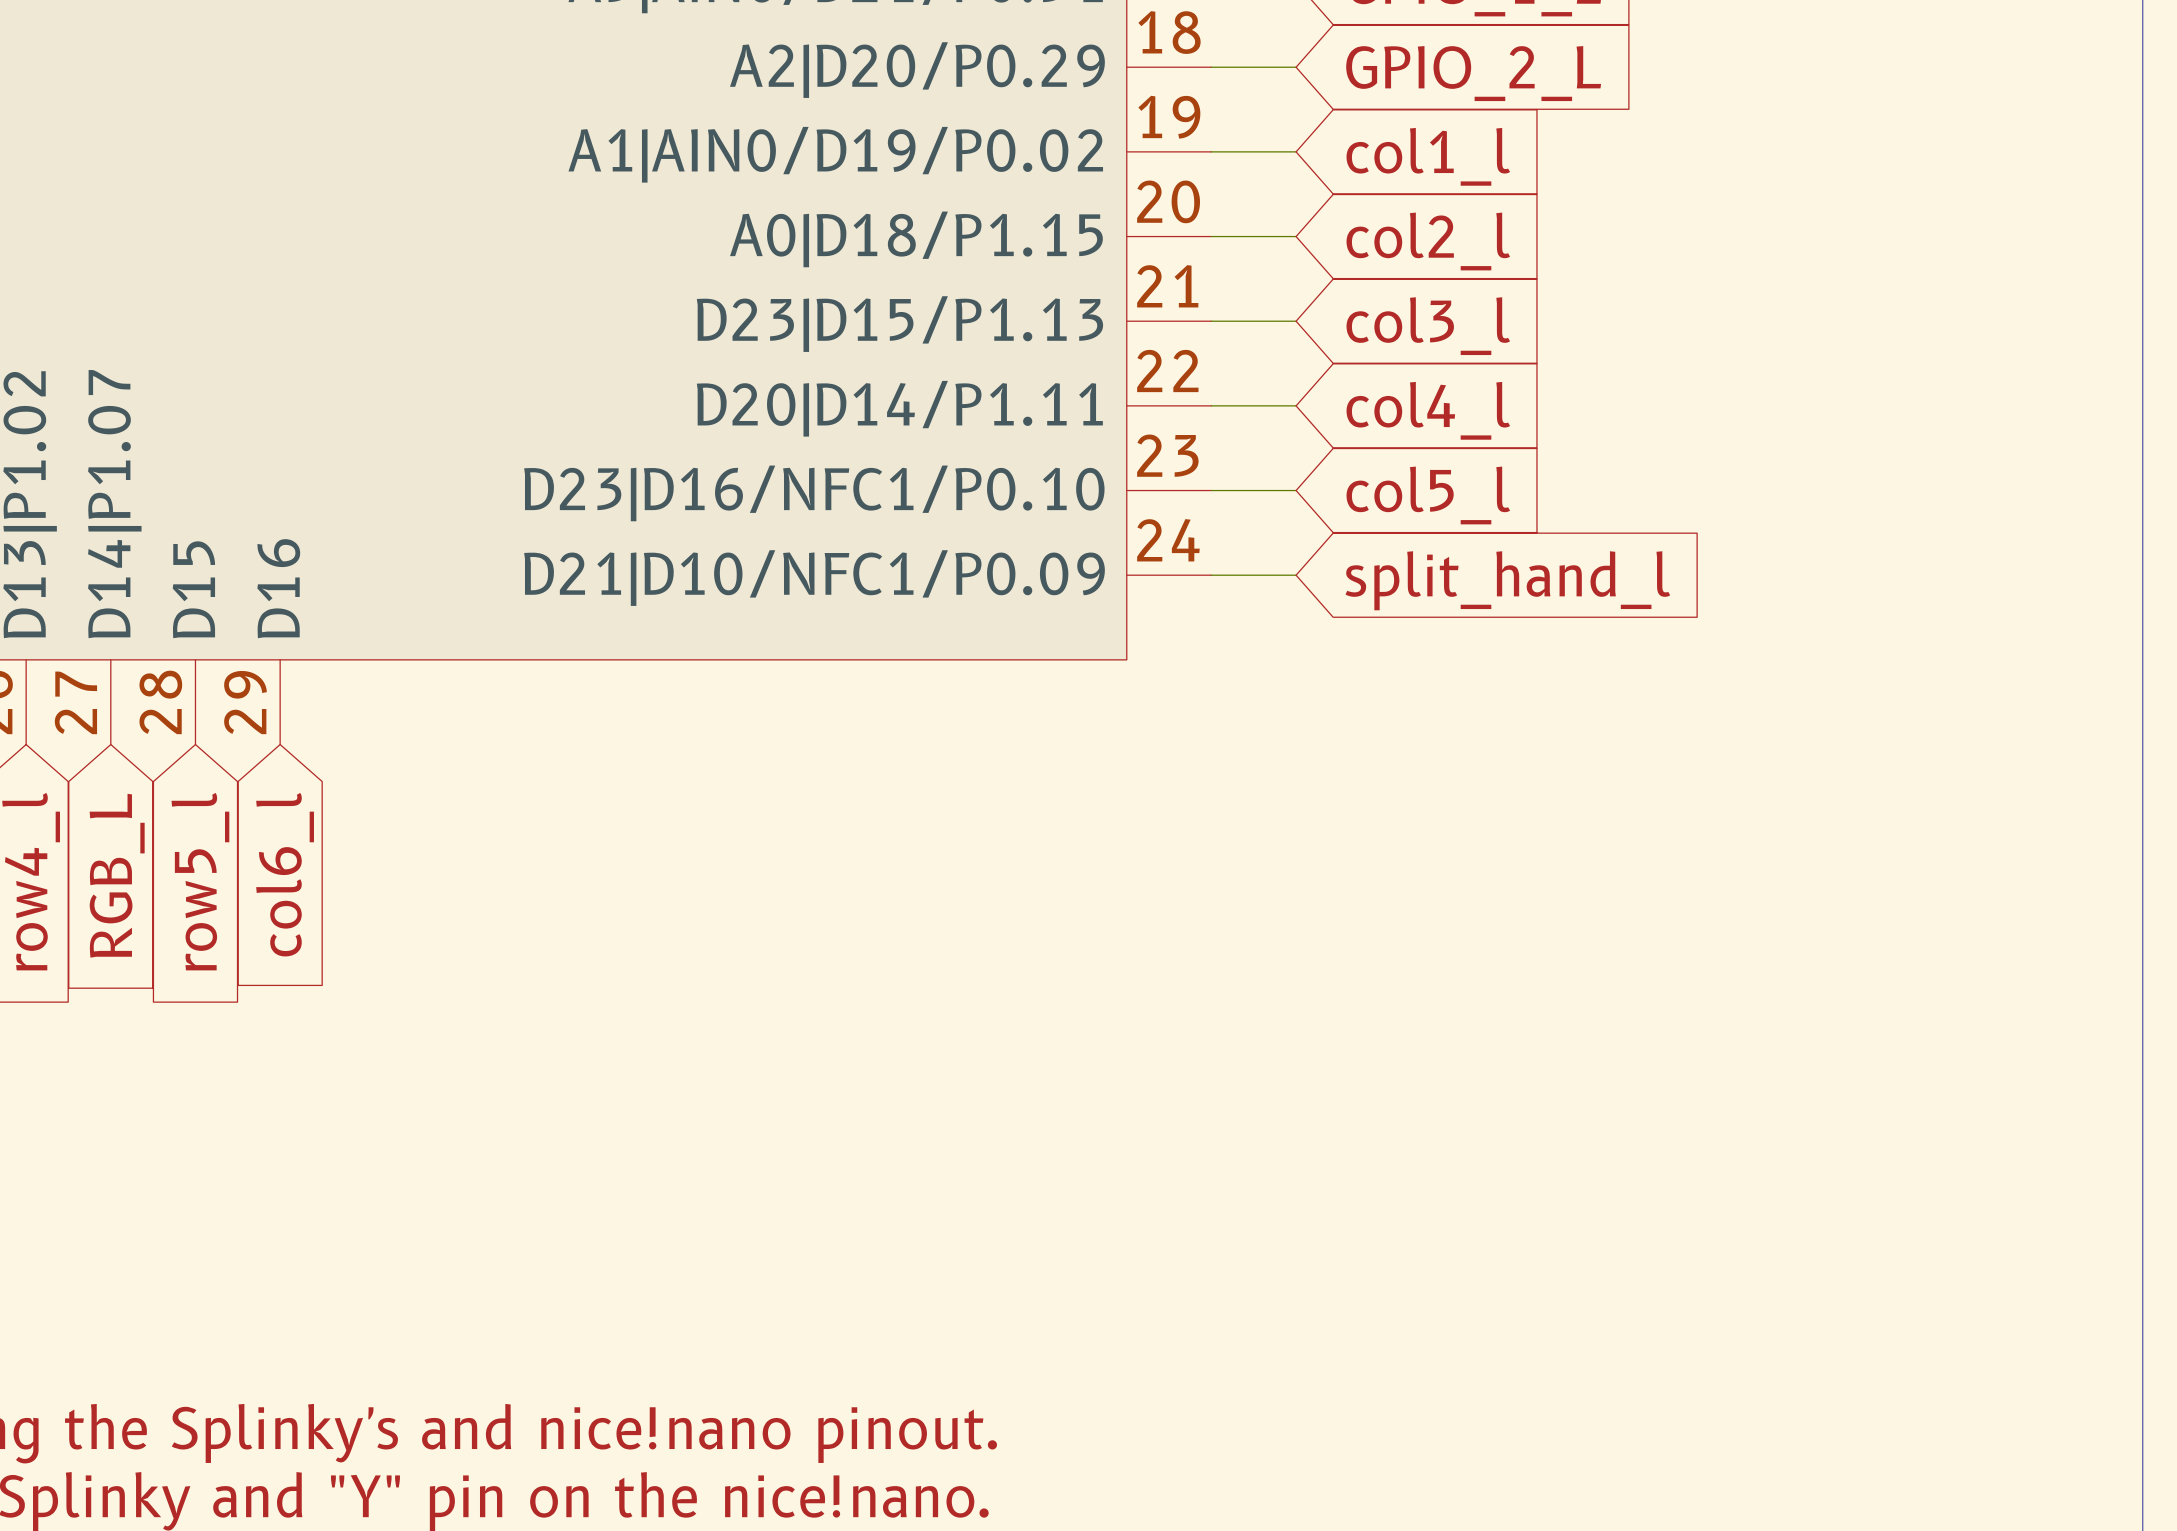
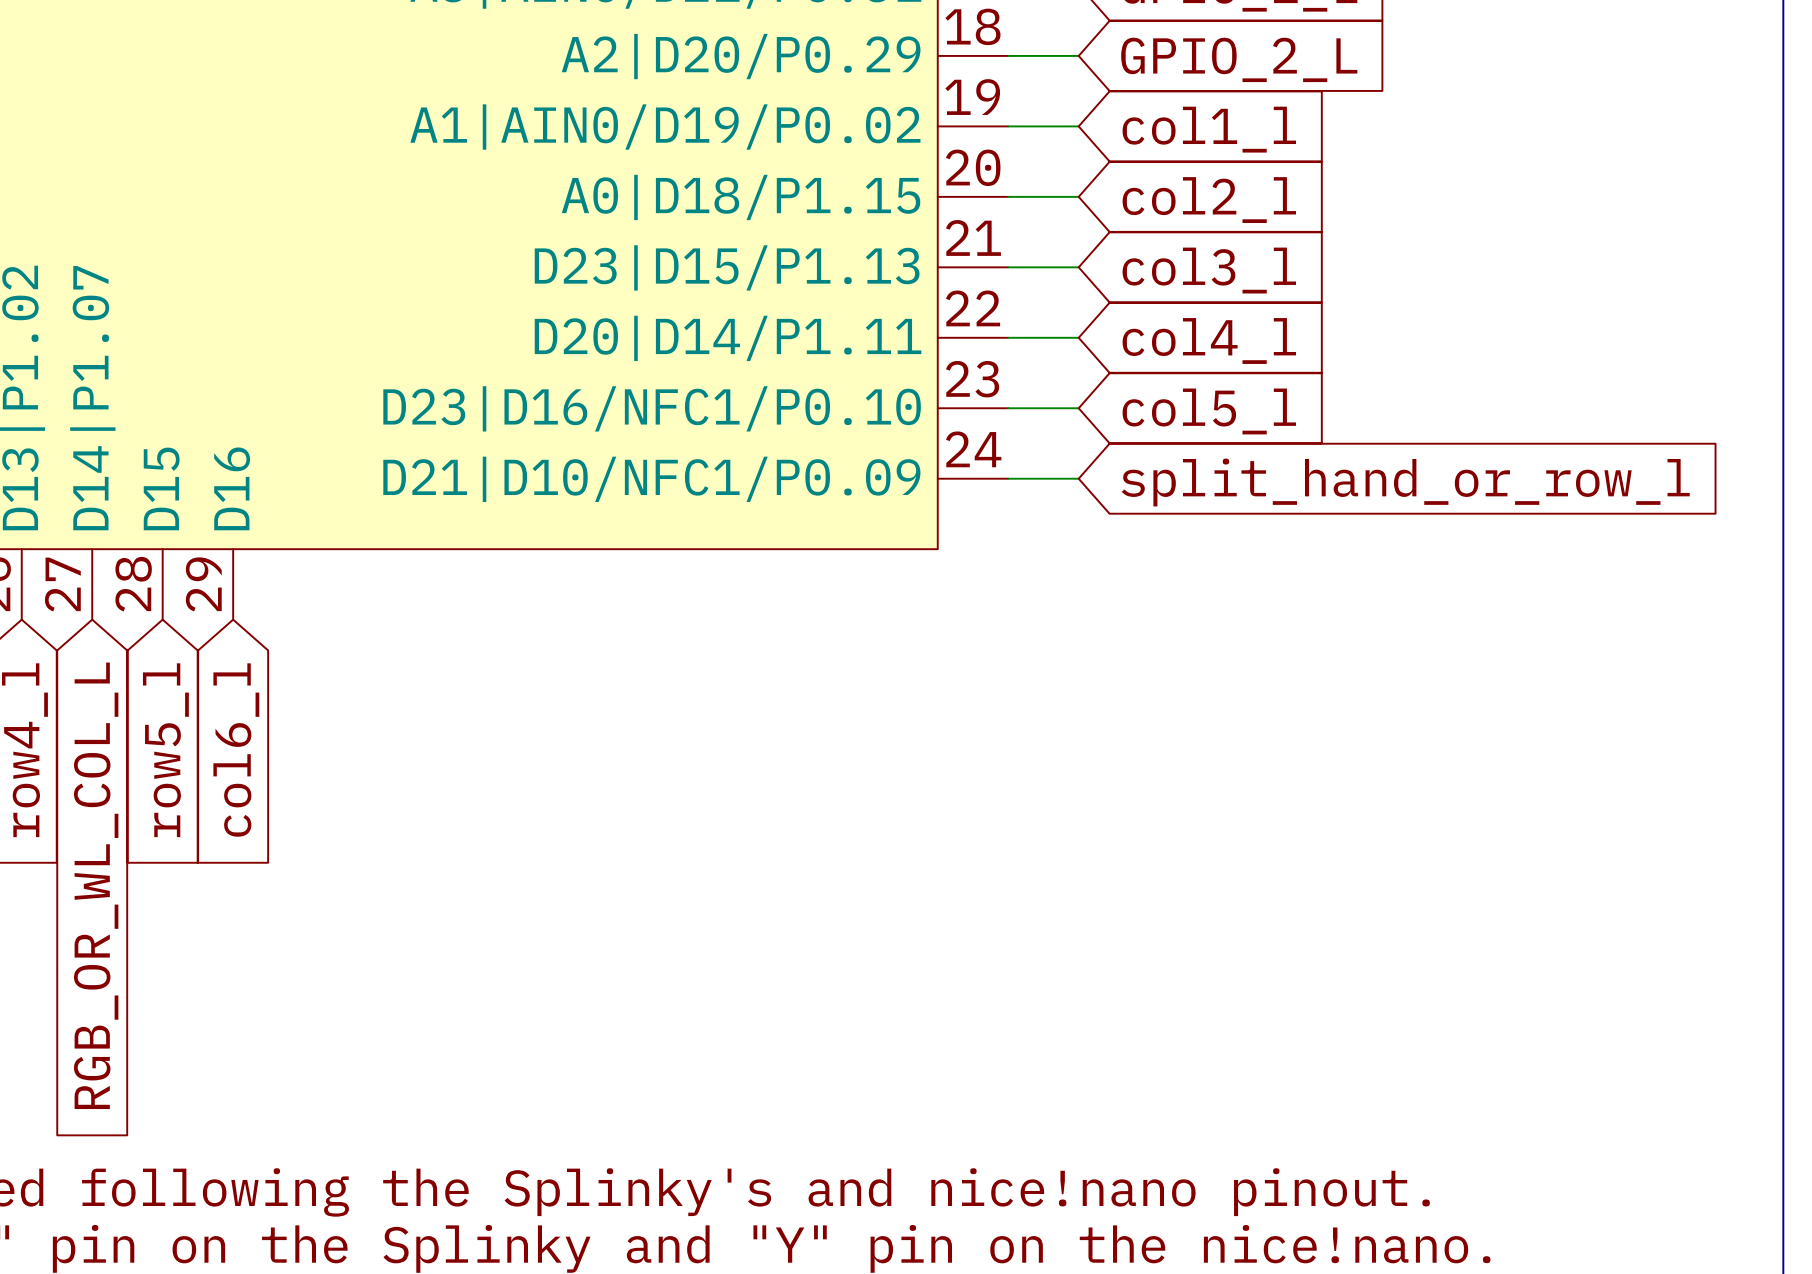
global label: split_hand_l (1507, 580) -> split_hand_or_row_l (1405, 482)
global label: RGB_L (117, 875) -> RGB_OR_WL_COL_L (96, 885)

